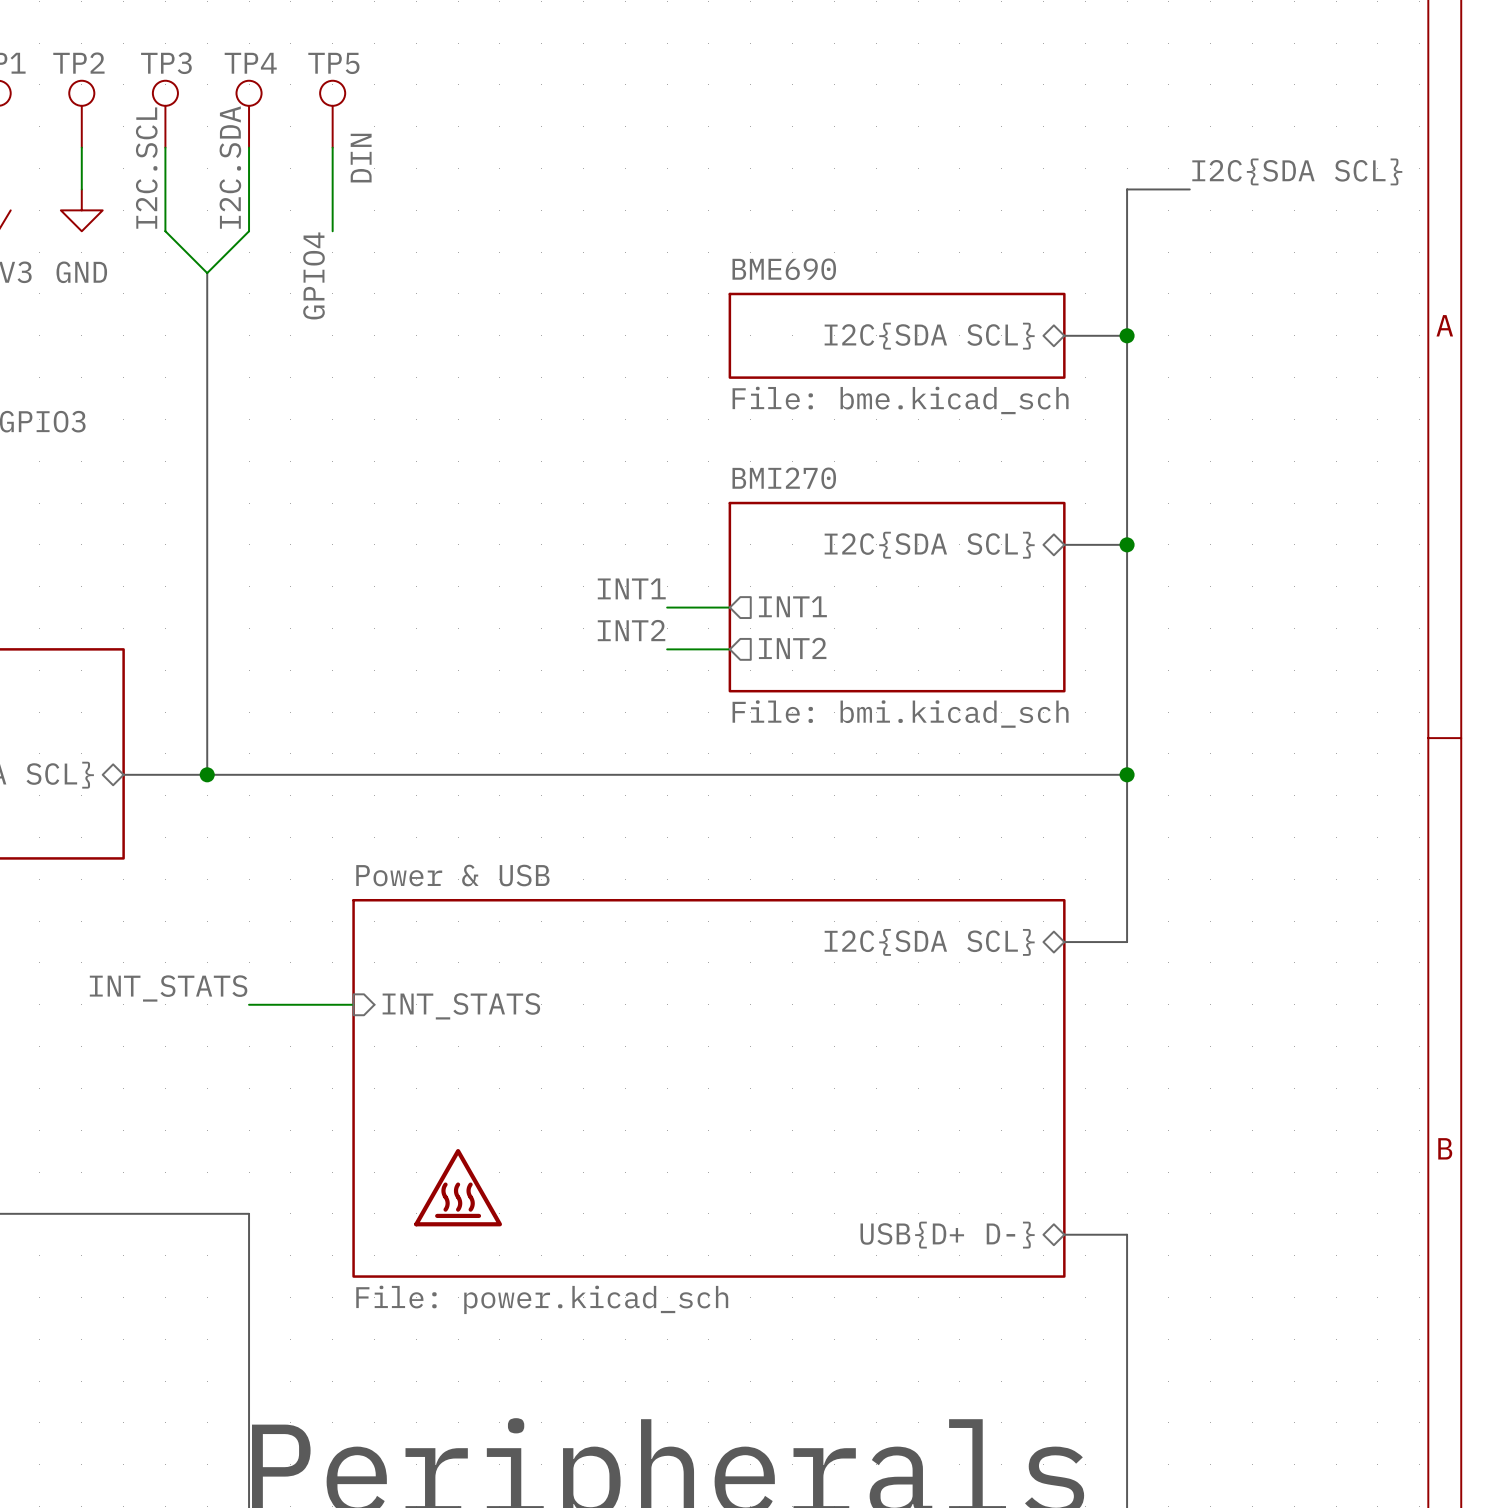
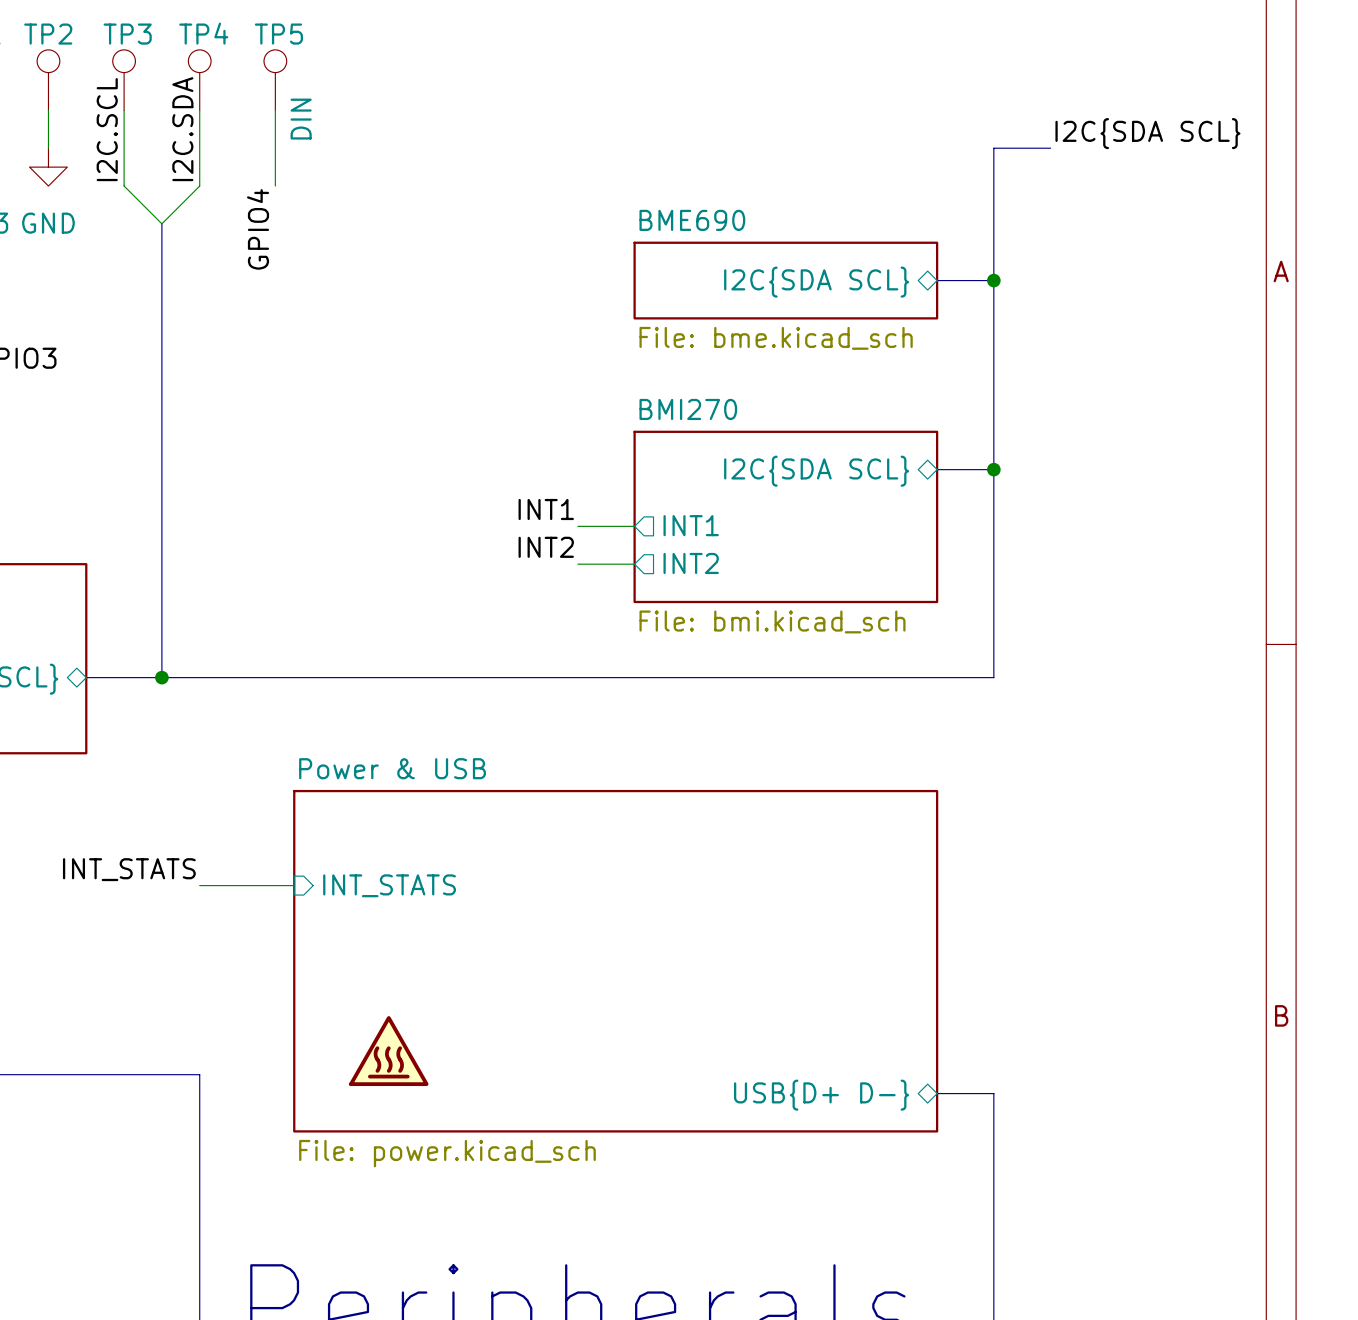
bus: (1127, 774) (1127, 942) (1064, 942) -> none
junction: (1127, 774) -> none
sheet pin: I2C{SDA SCL} (929, 942) -> none

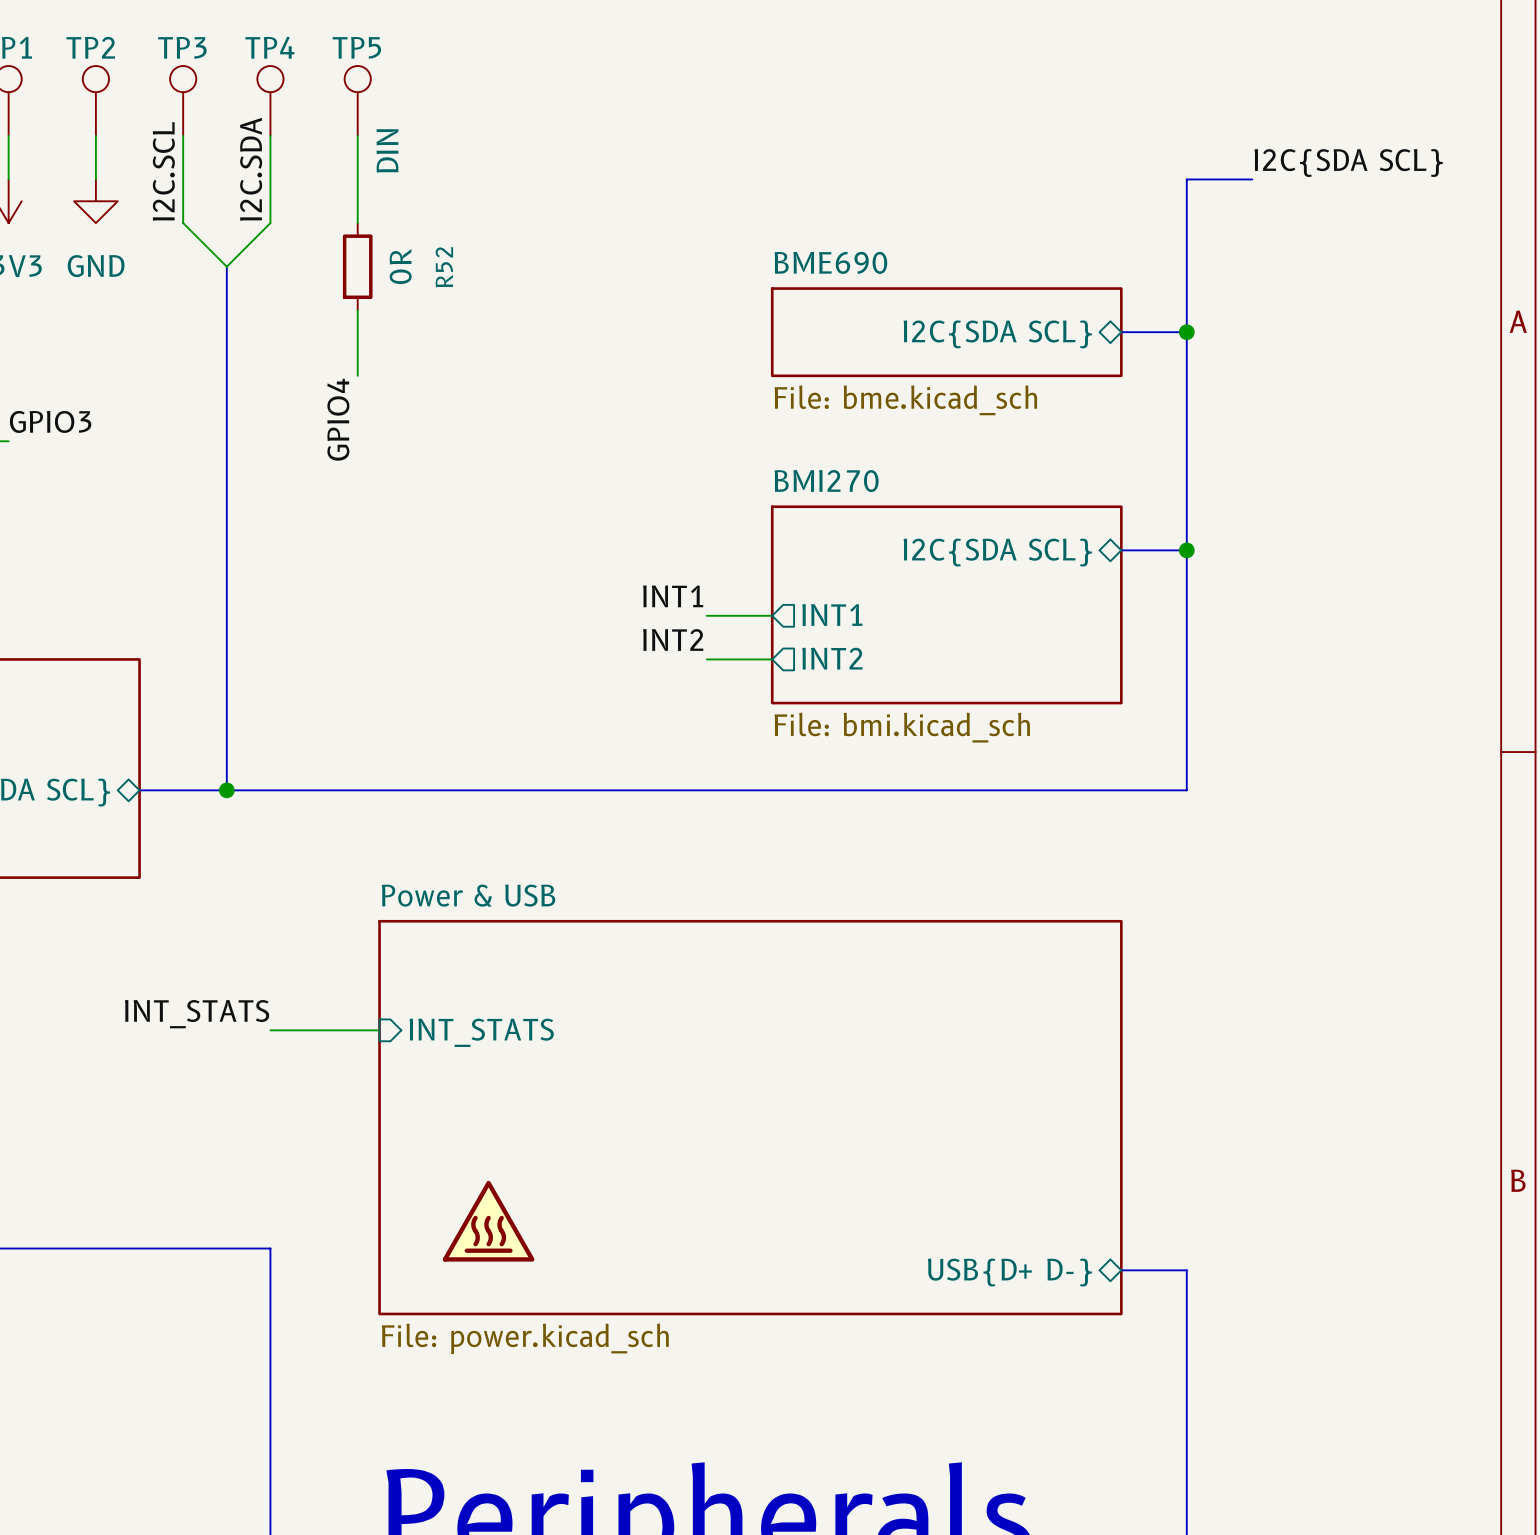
R52: none -> 0R (357, 266)
label position: GPIO4 (258, 229) -> GPIO4 (338, 419)
wire: none -> (357, 310) (357, 375)

